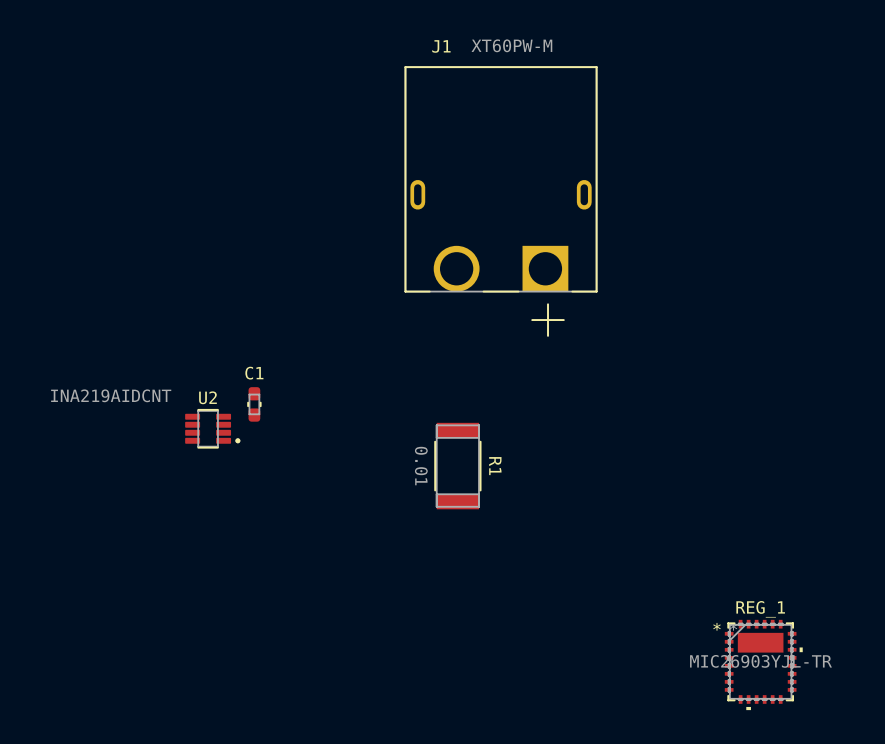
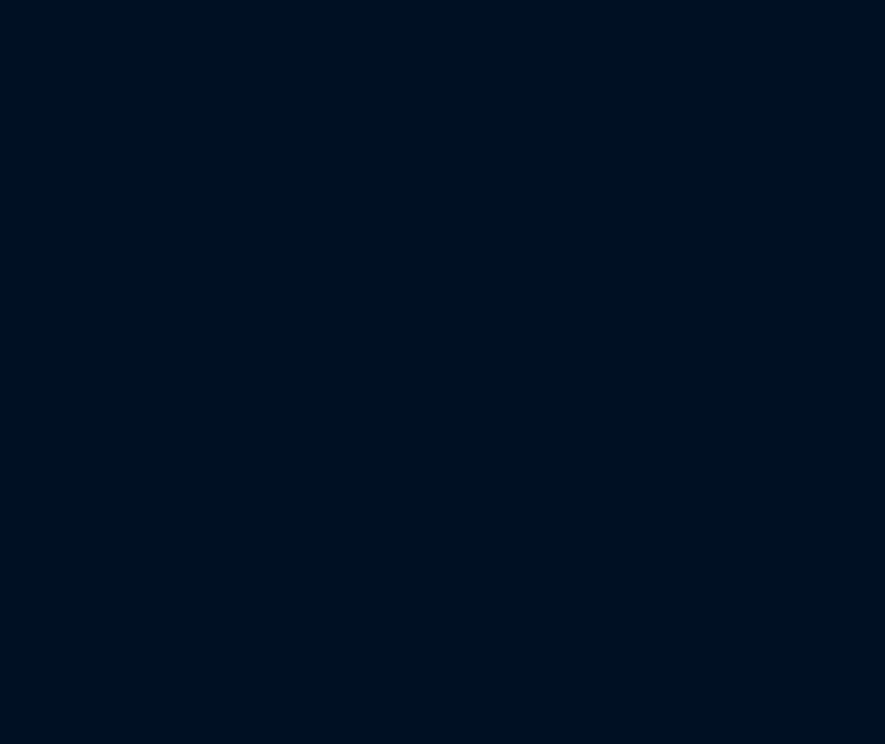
J1: XT60PW-M (501, 201) -> none
C1: (254, 404) -> none
U2: INA219AIDCNT (212, 428) -> none
R1: 0.01 (457, 466) -> none
REG_1: MIC26903YJL-TR (763, 664) -> none

